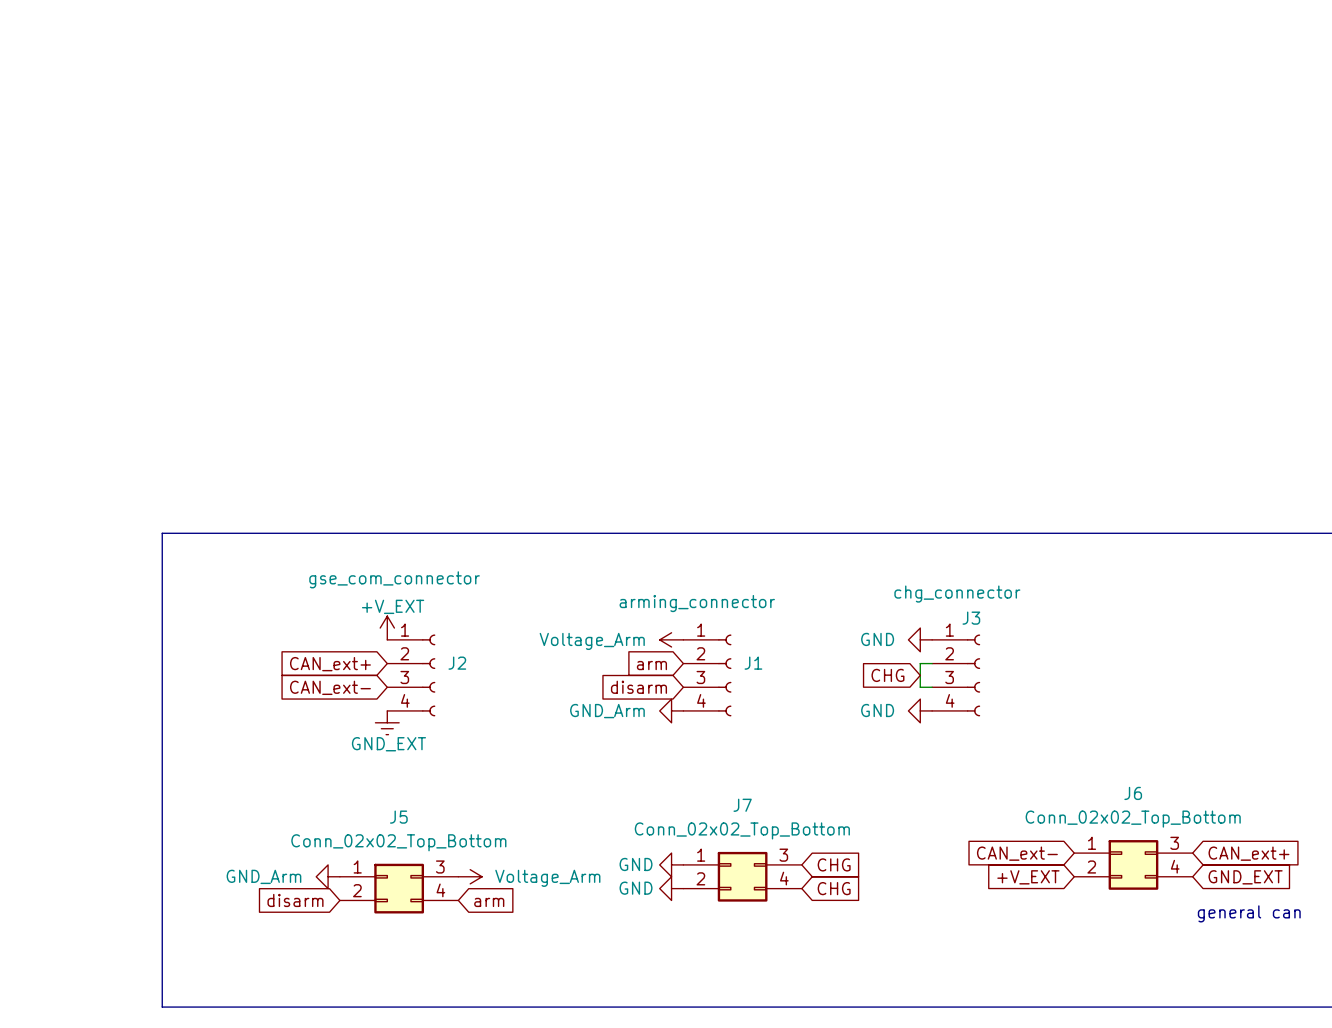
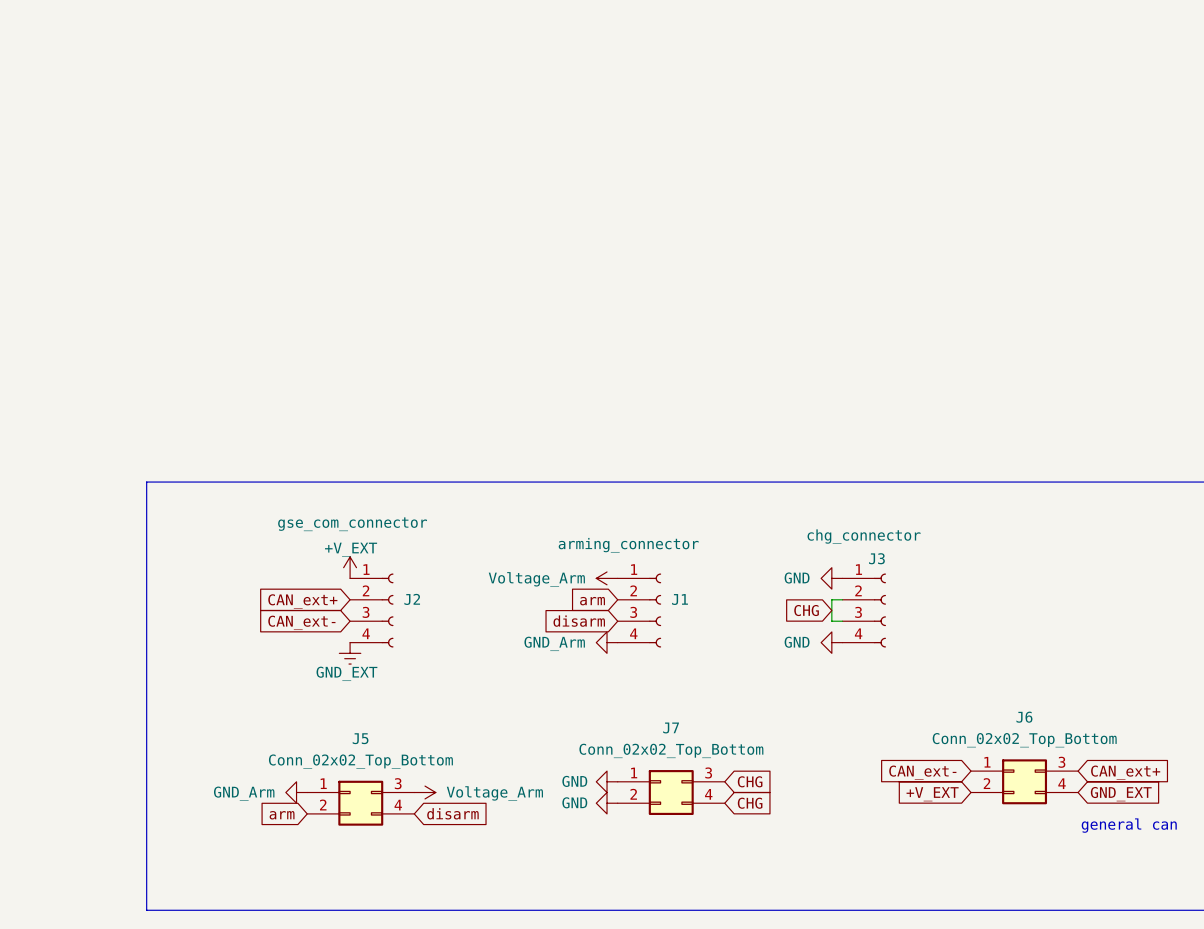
global label: disarm (295, 900) -> arm (282, 815)
global label: arm (489, 902) -> disarm (452, 813)

